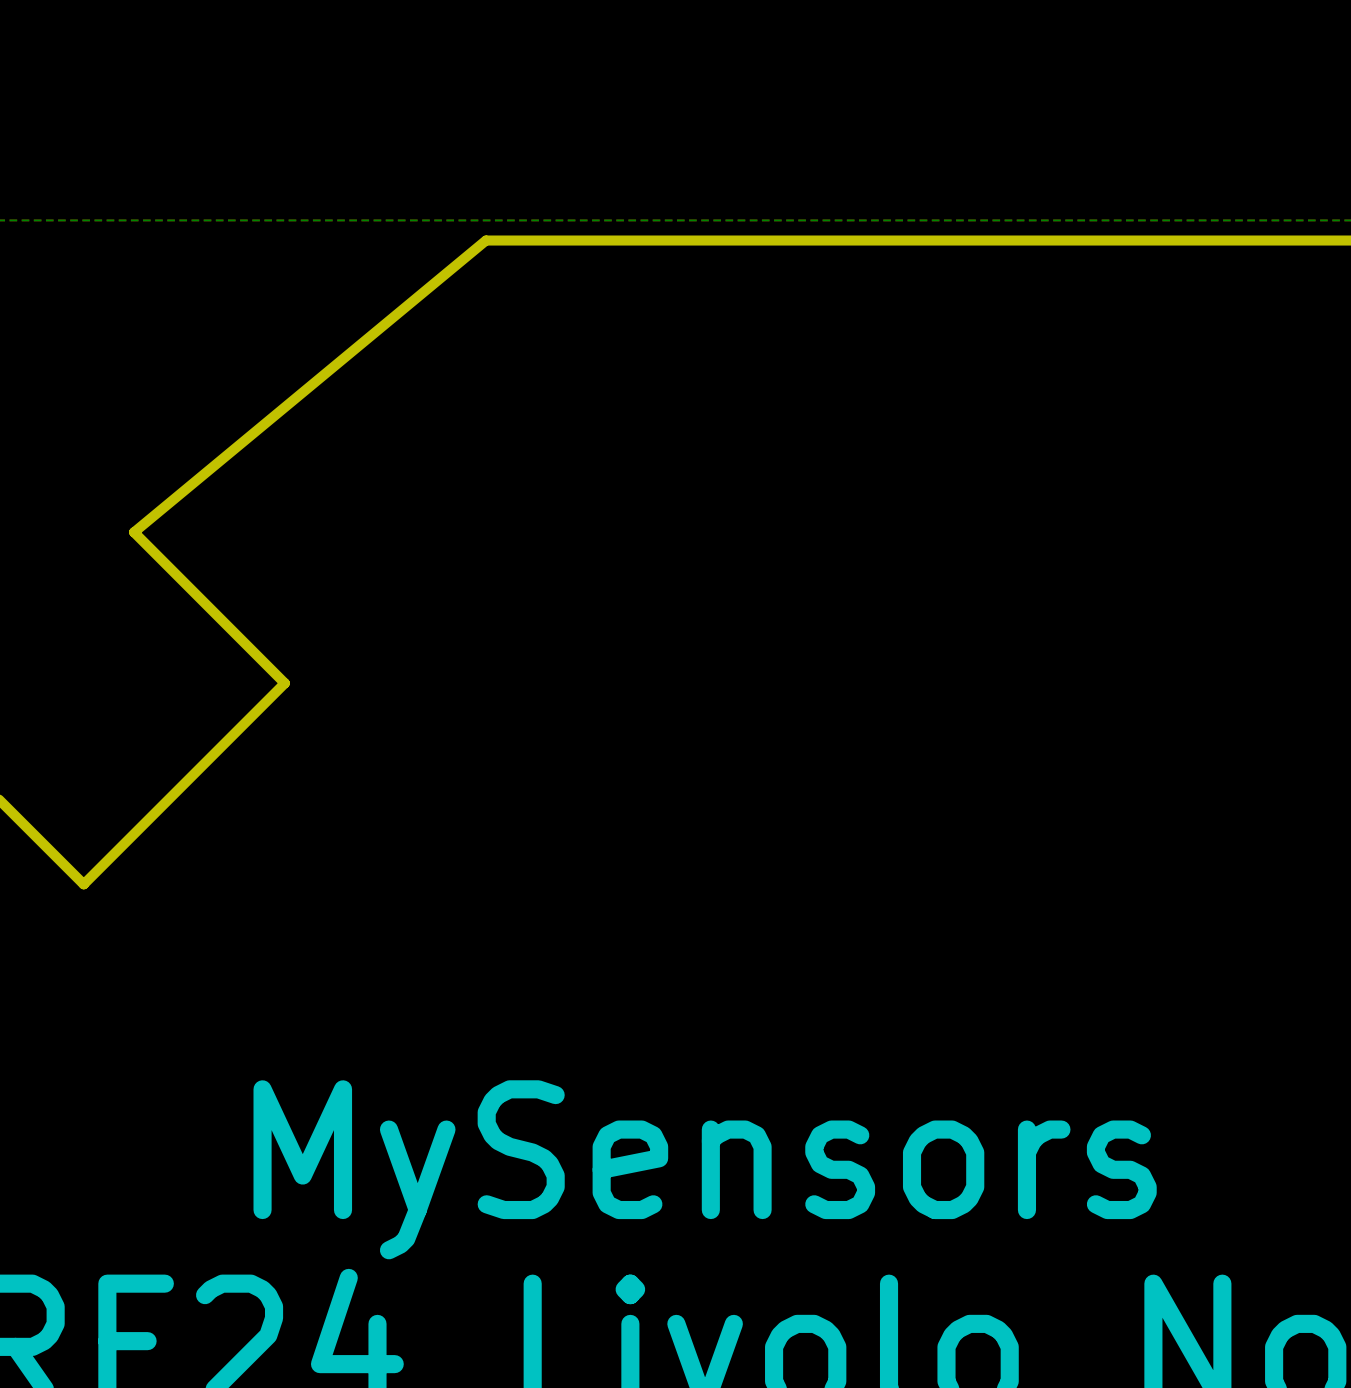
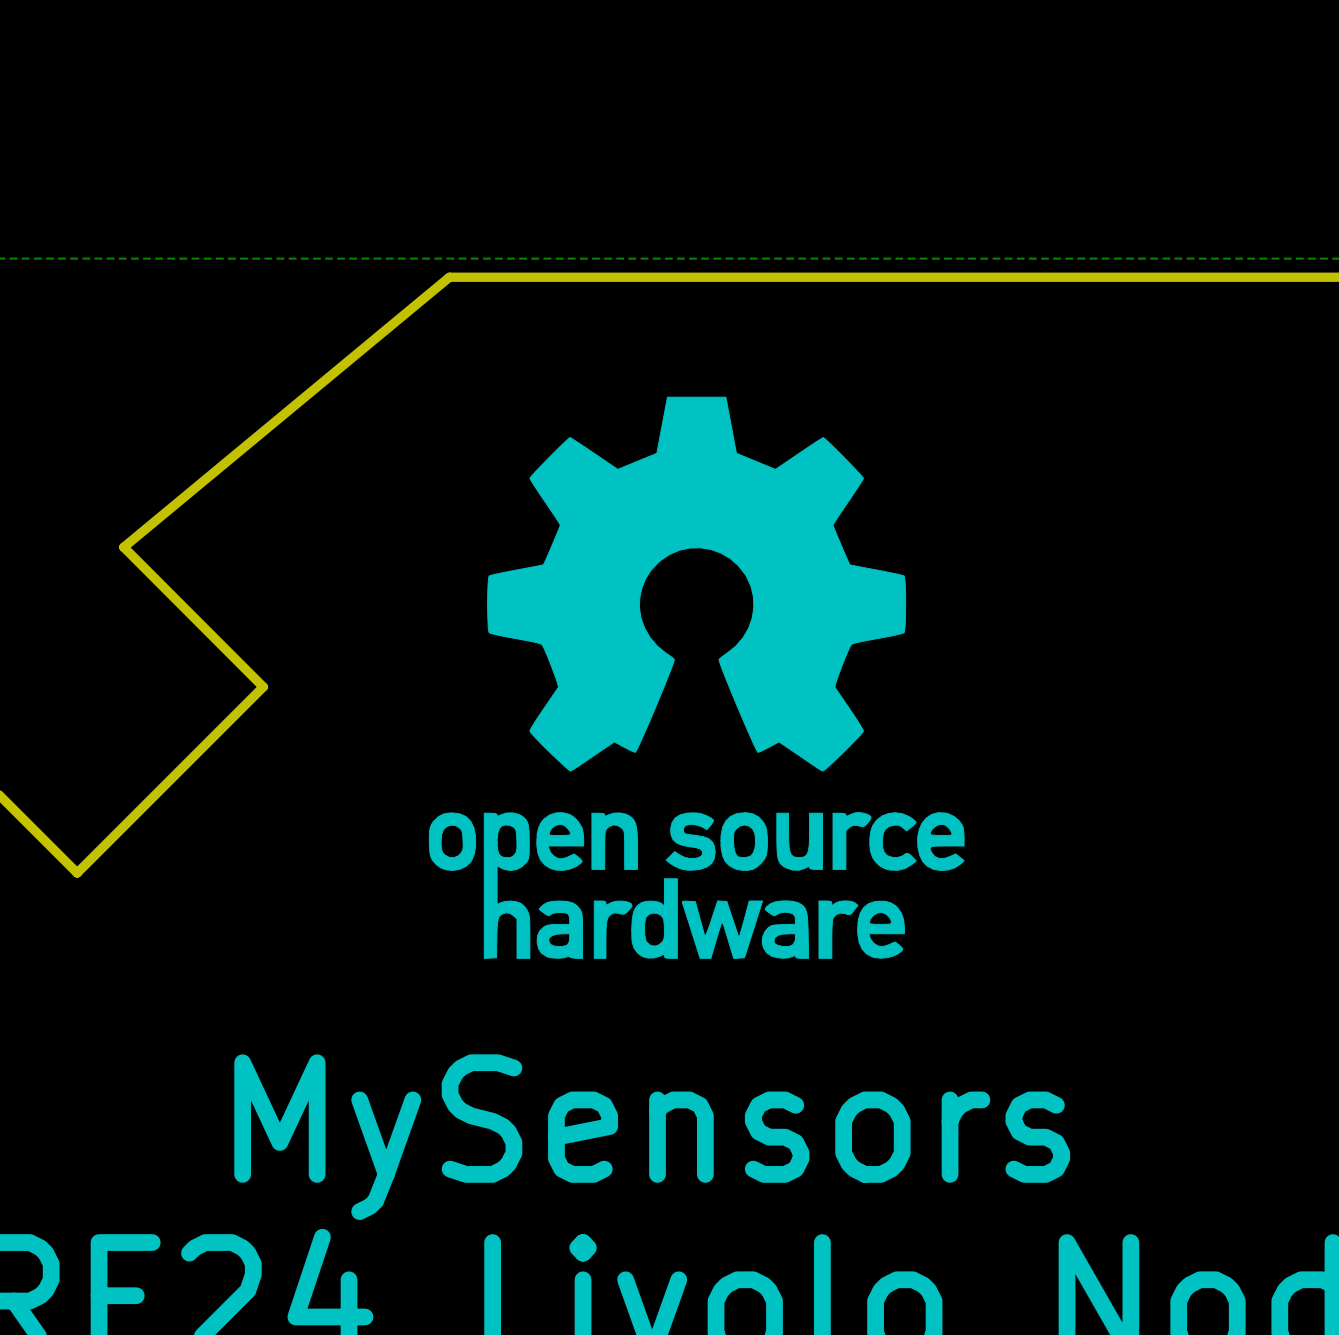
drawing: none -> [428, 396, 965, 959]

